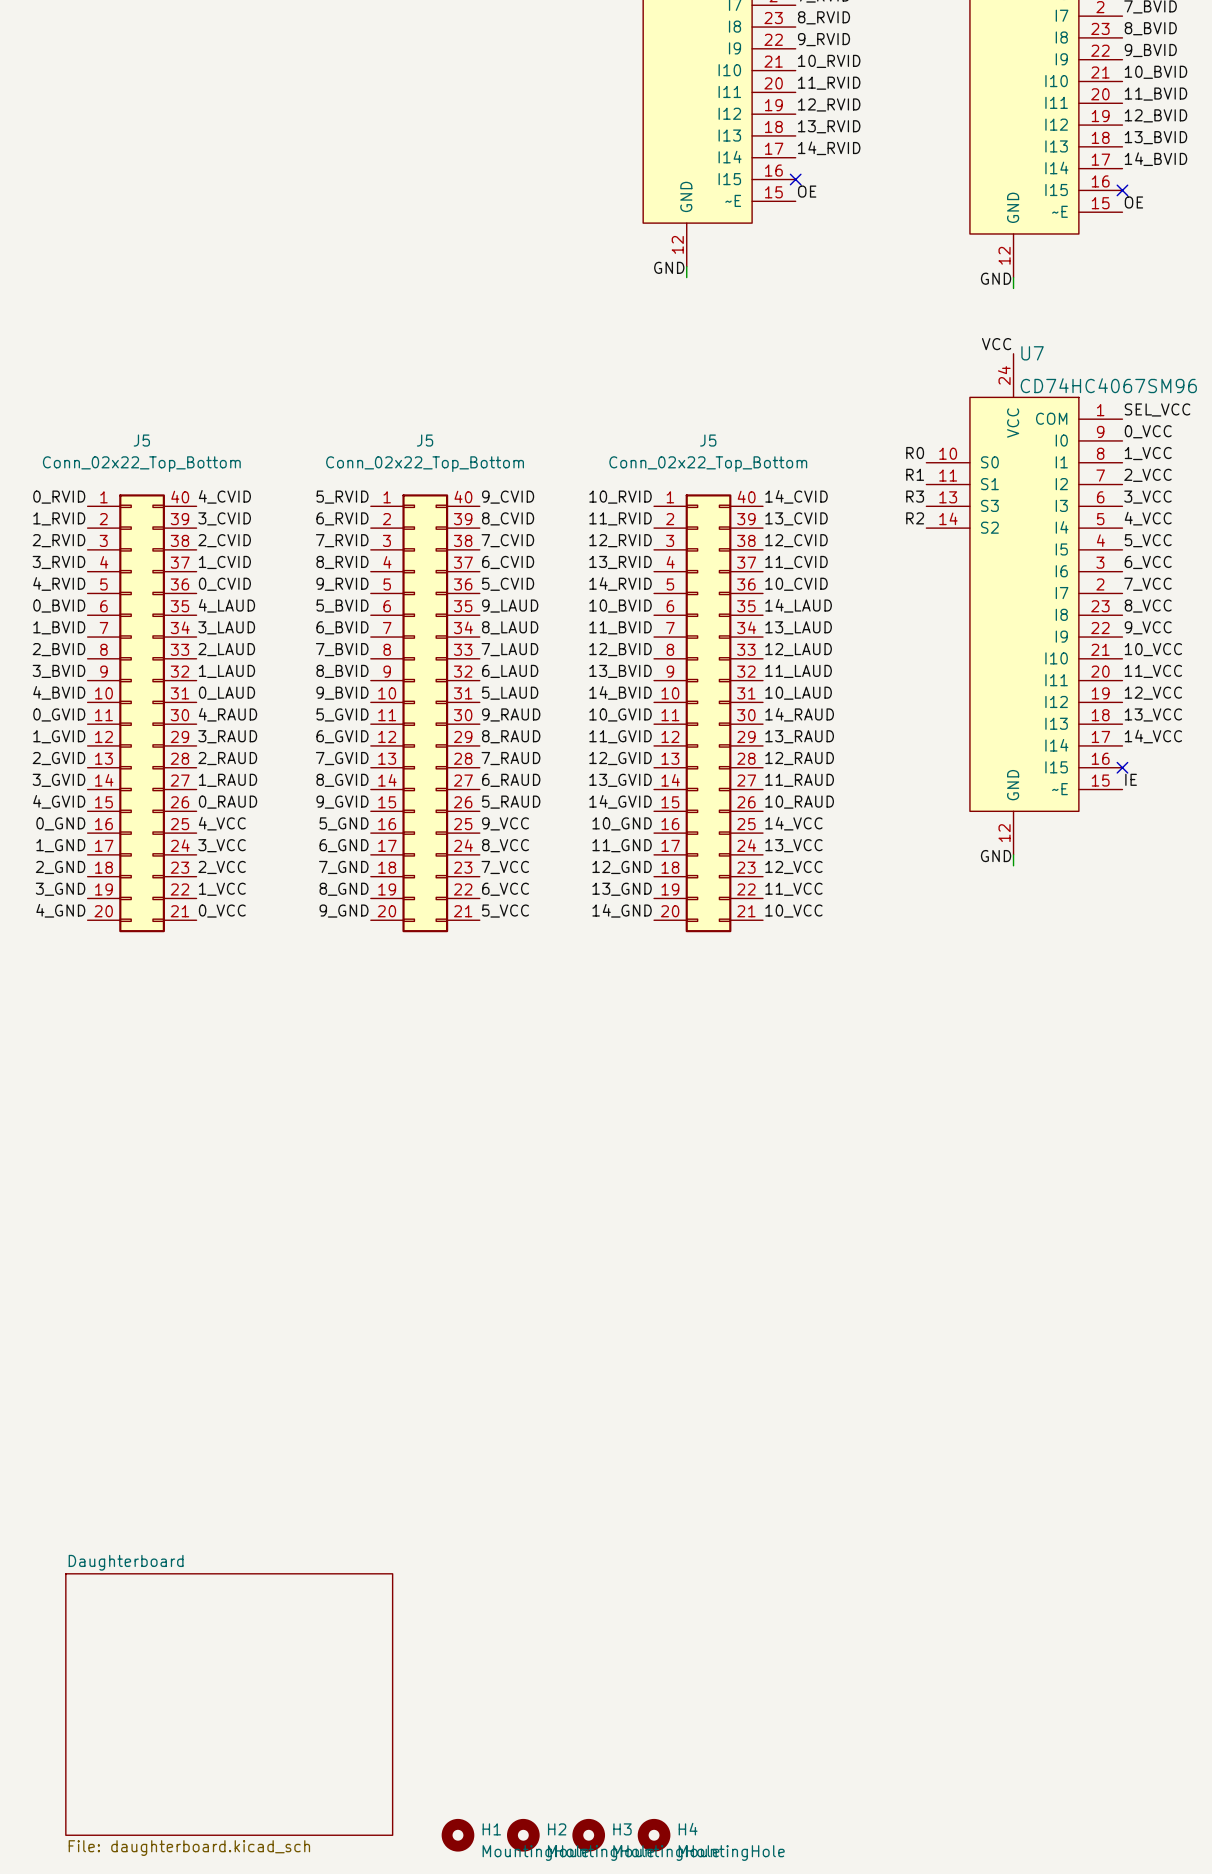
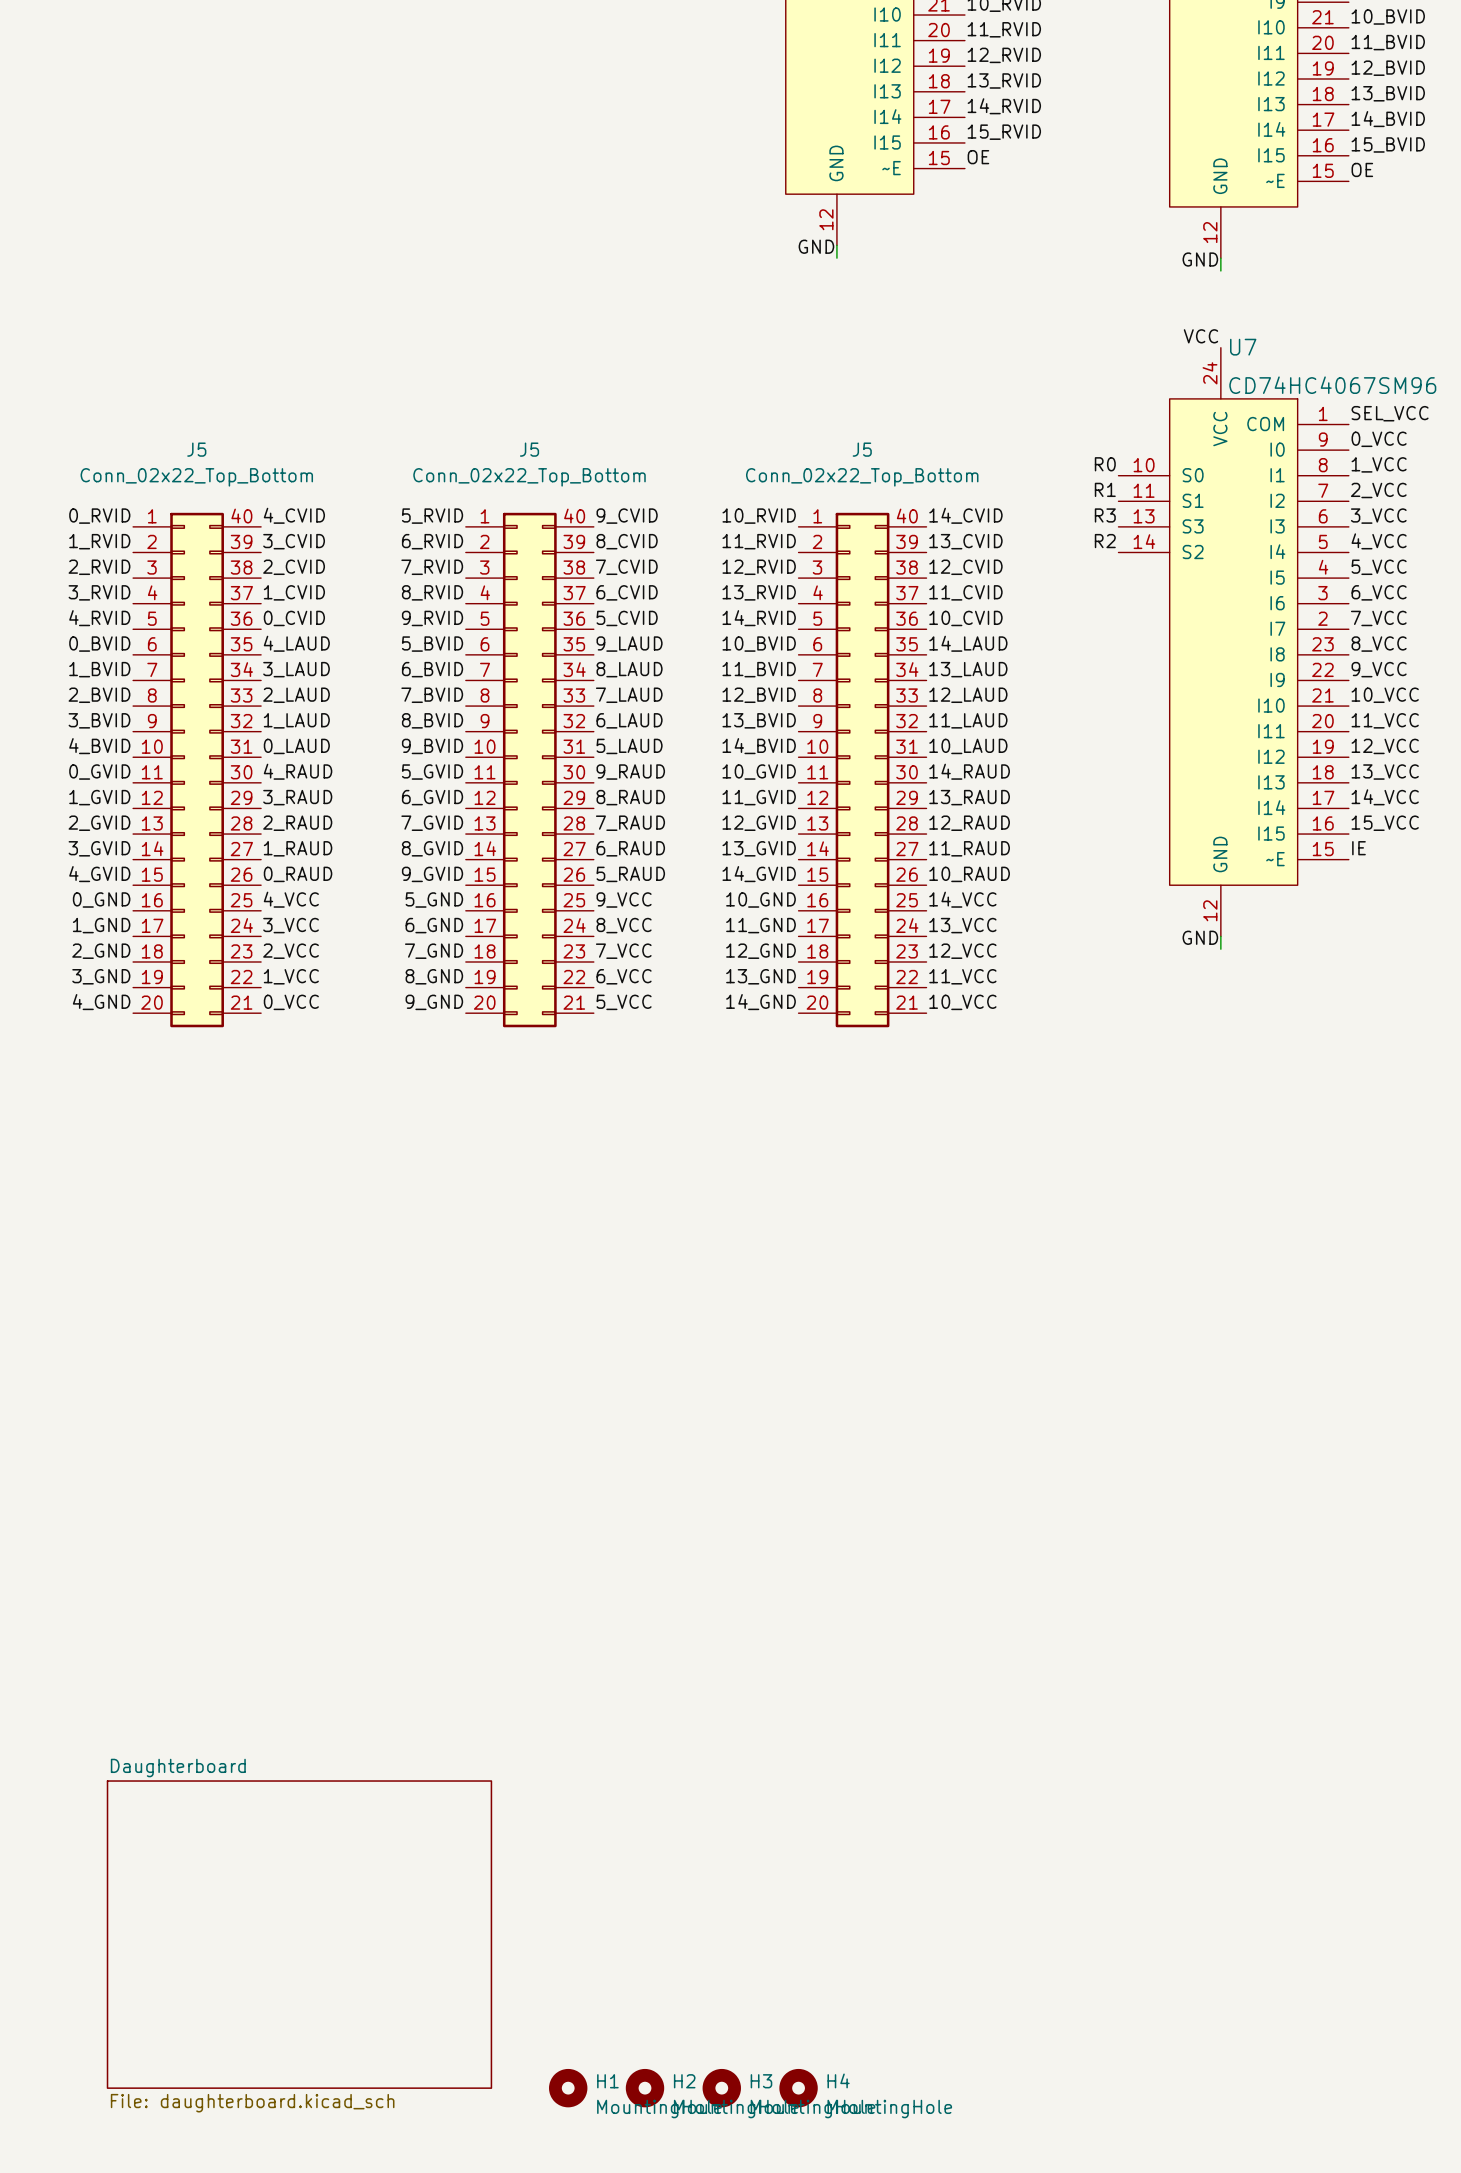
label: none -> 15_RVID (1004, 132)
no-connect mark: (795, 179) -> none
label: none -> 15_BVID (1388, 144)
no-connect mark: (1122, 190) -> none
label: none -> 15_VCC (1385, 823)
no-connect mark: (1122, 767) -> none

